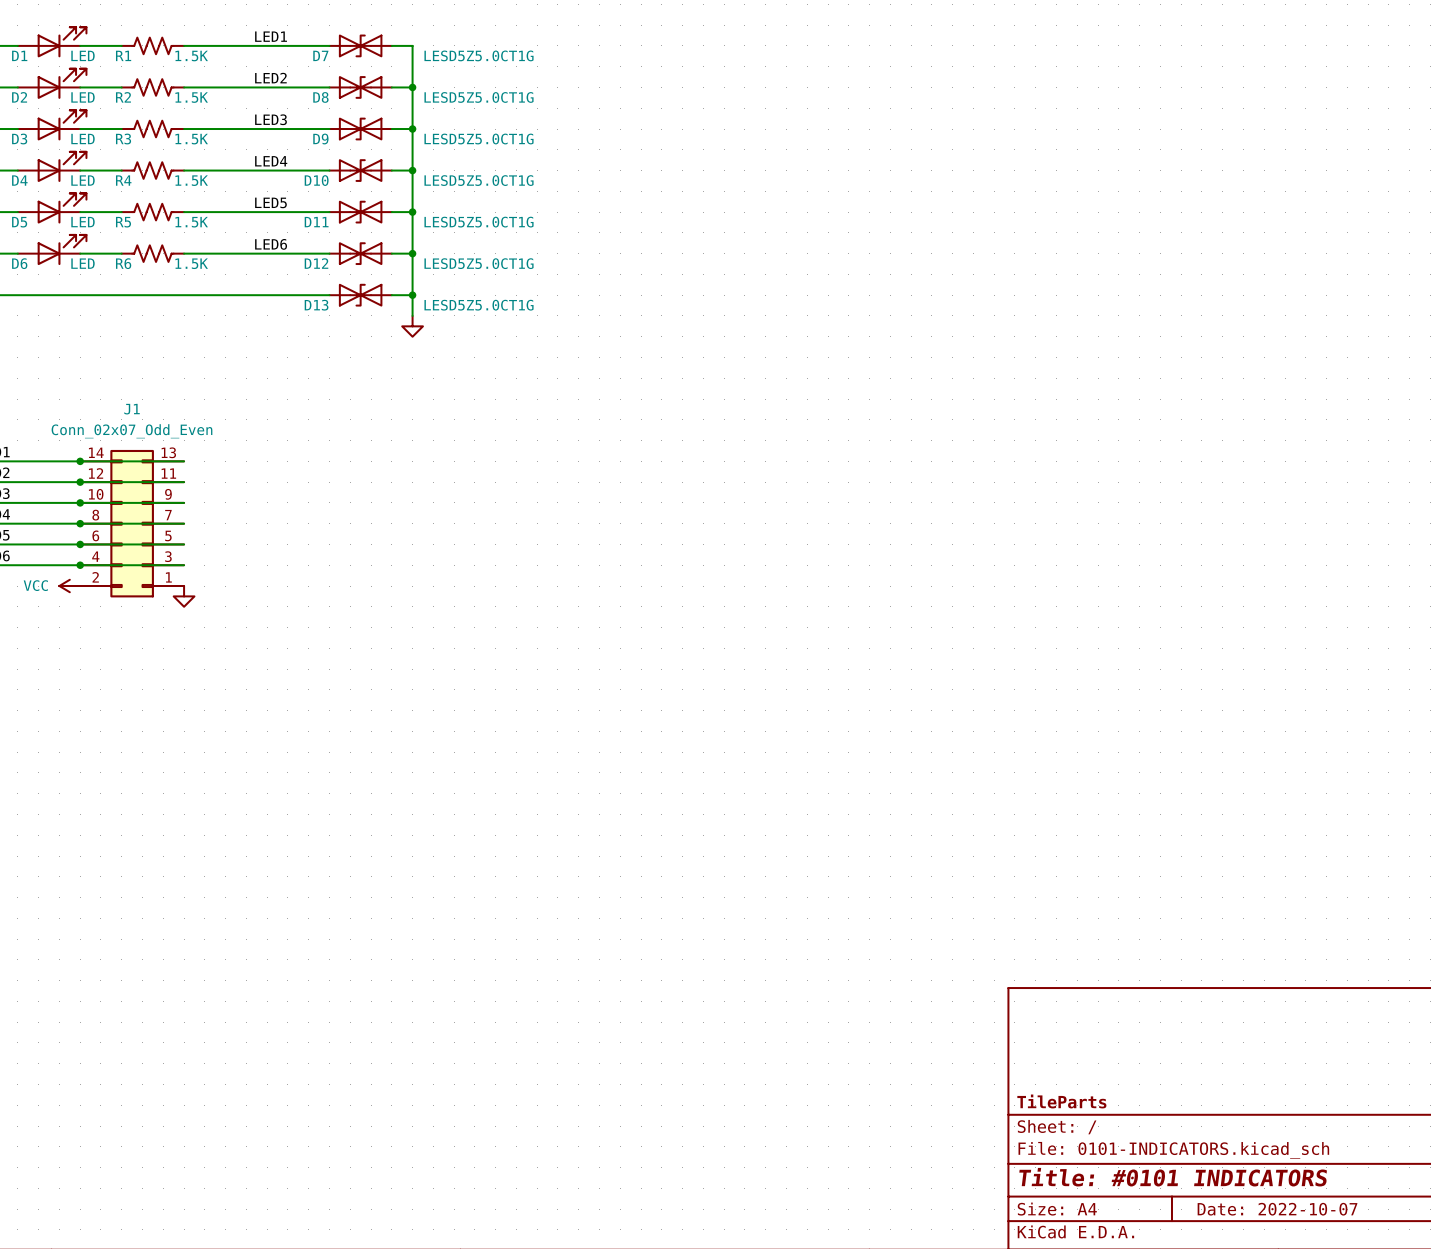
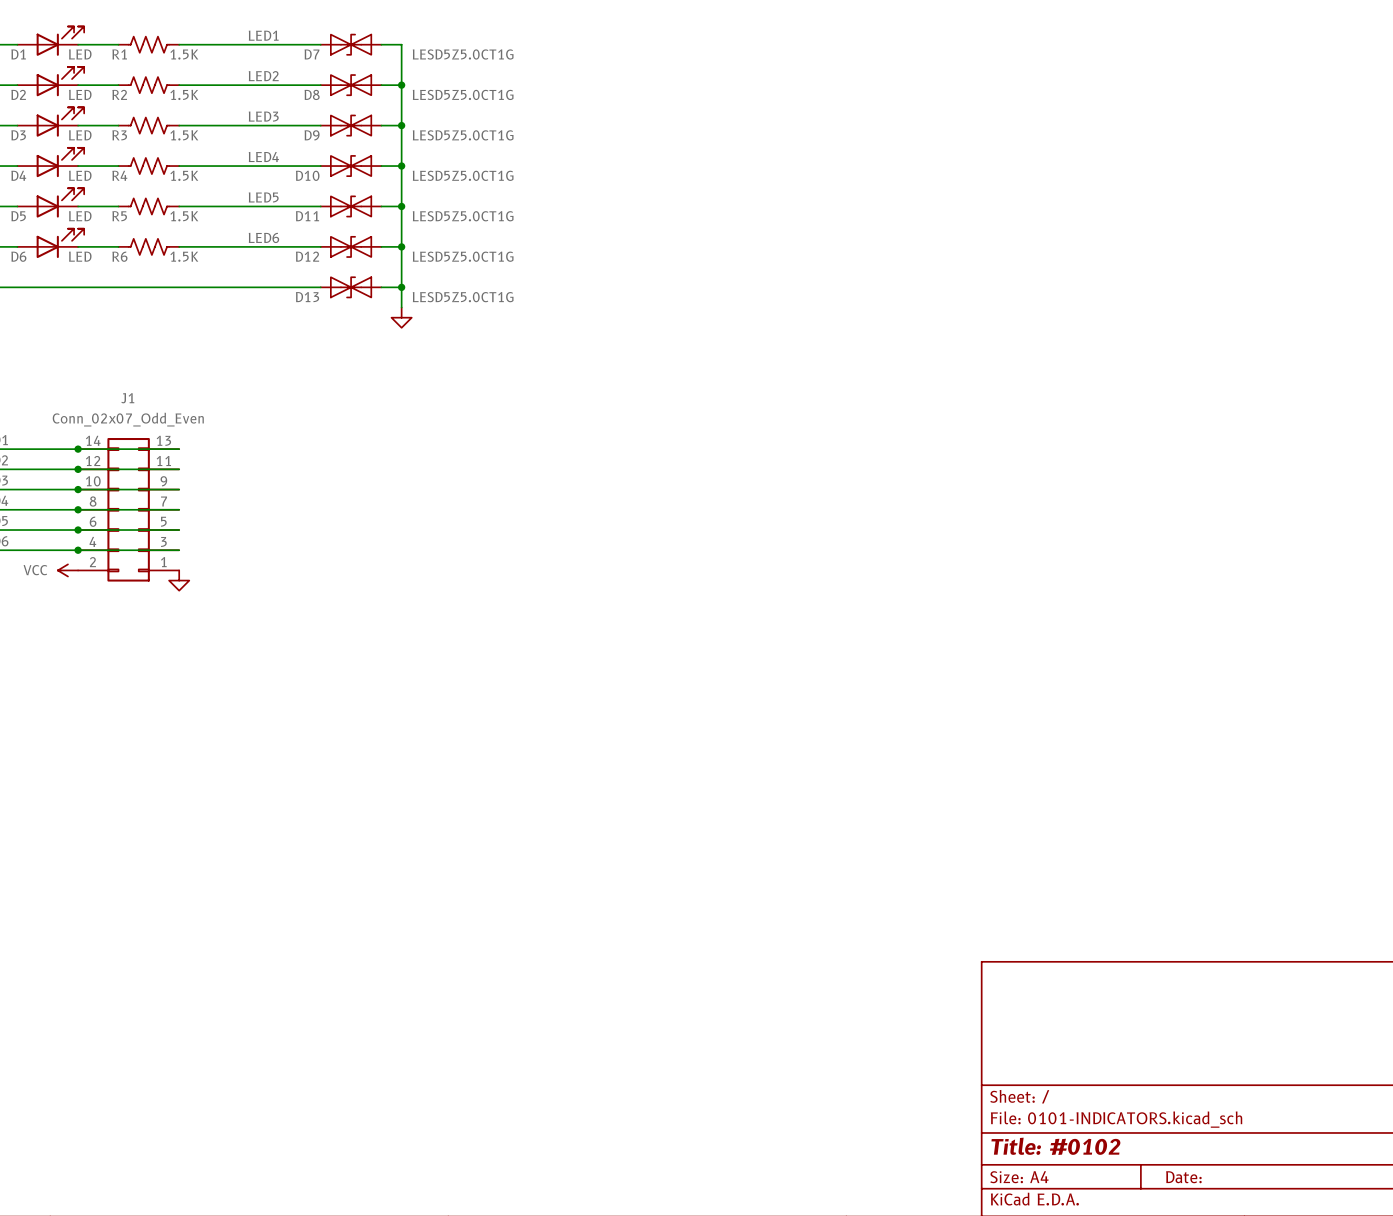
title block: TileParts (1061, 1101) -> none
title block: Title: #0101 INDICATORS (1173, 1177) -> Title: #0102 (1055, 1146)
title block: Date: 2022-10-07 (1277, 1209) -> Date: (1183, 1177)

